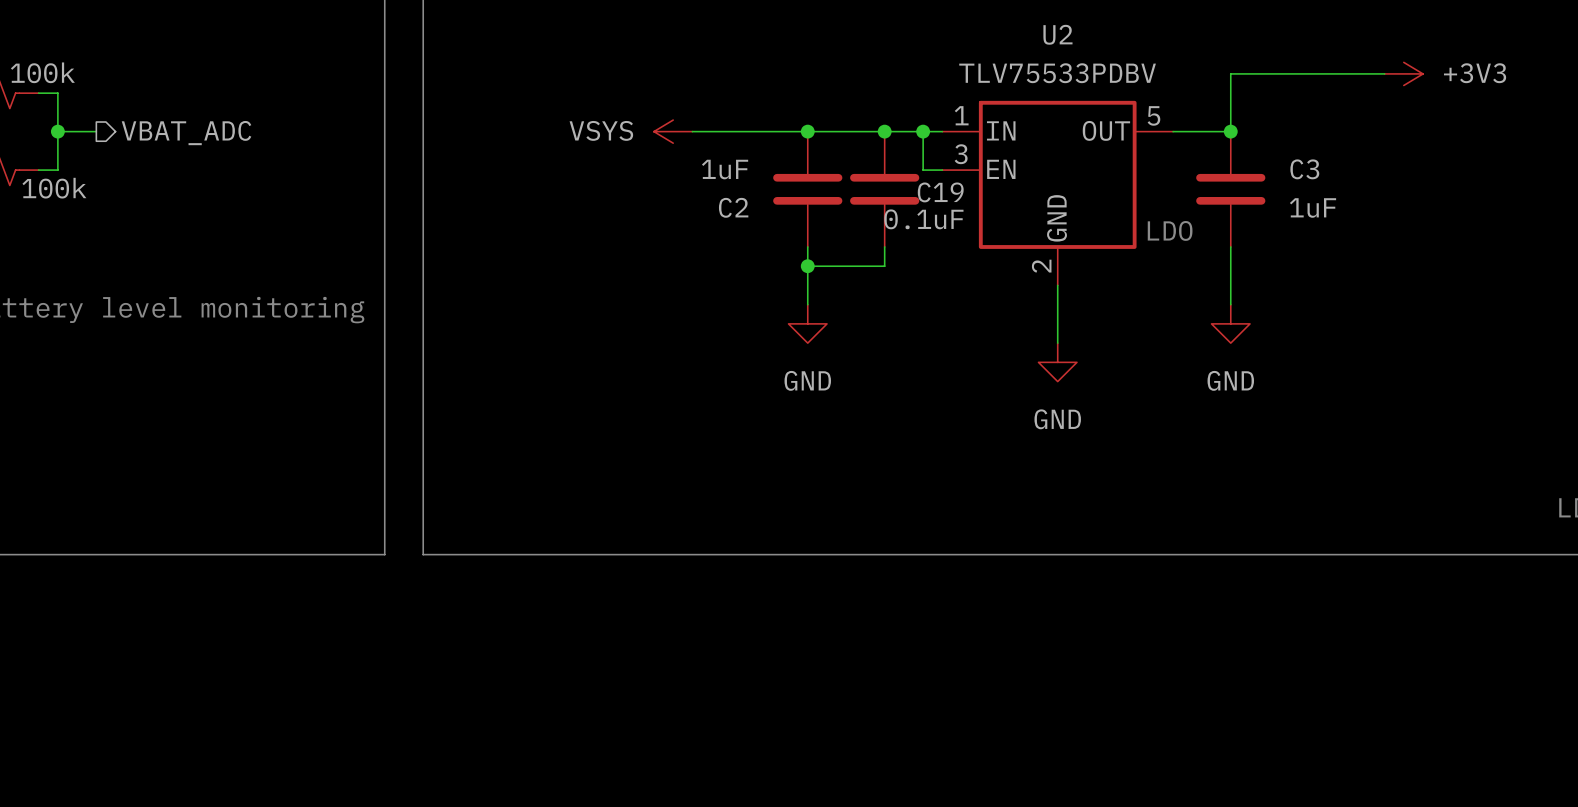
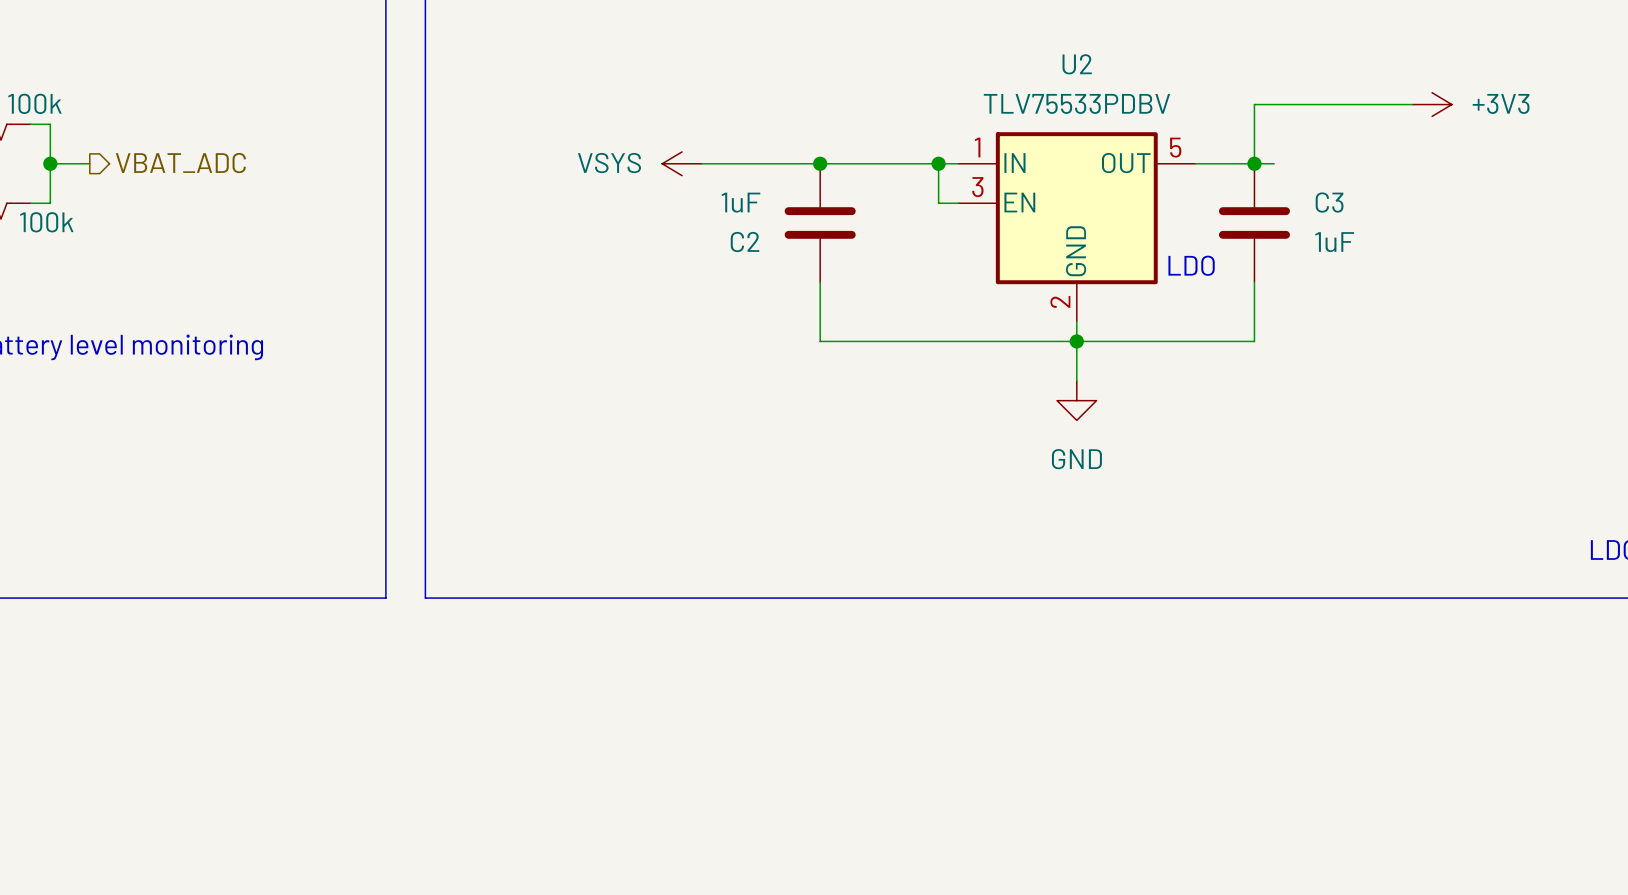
junction: (884, 131) -> none
wire: none -> (1254, 163) (1274, 163)
C19: 0.1uF (884, 189) -> none
wire: (884, 246) (884, 266) (807, 266) -> none
junction: (807, 266) -> none
wire: none -> (820, 341) (1254, 341)
junction: none -> (1076, 341)
power symbol: GND (807, 323) -> none
power symbol: GND (1230, 323) -> none

